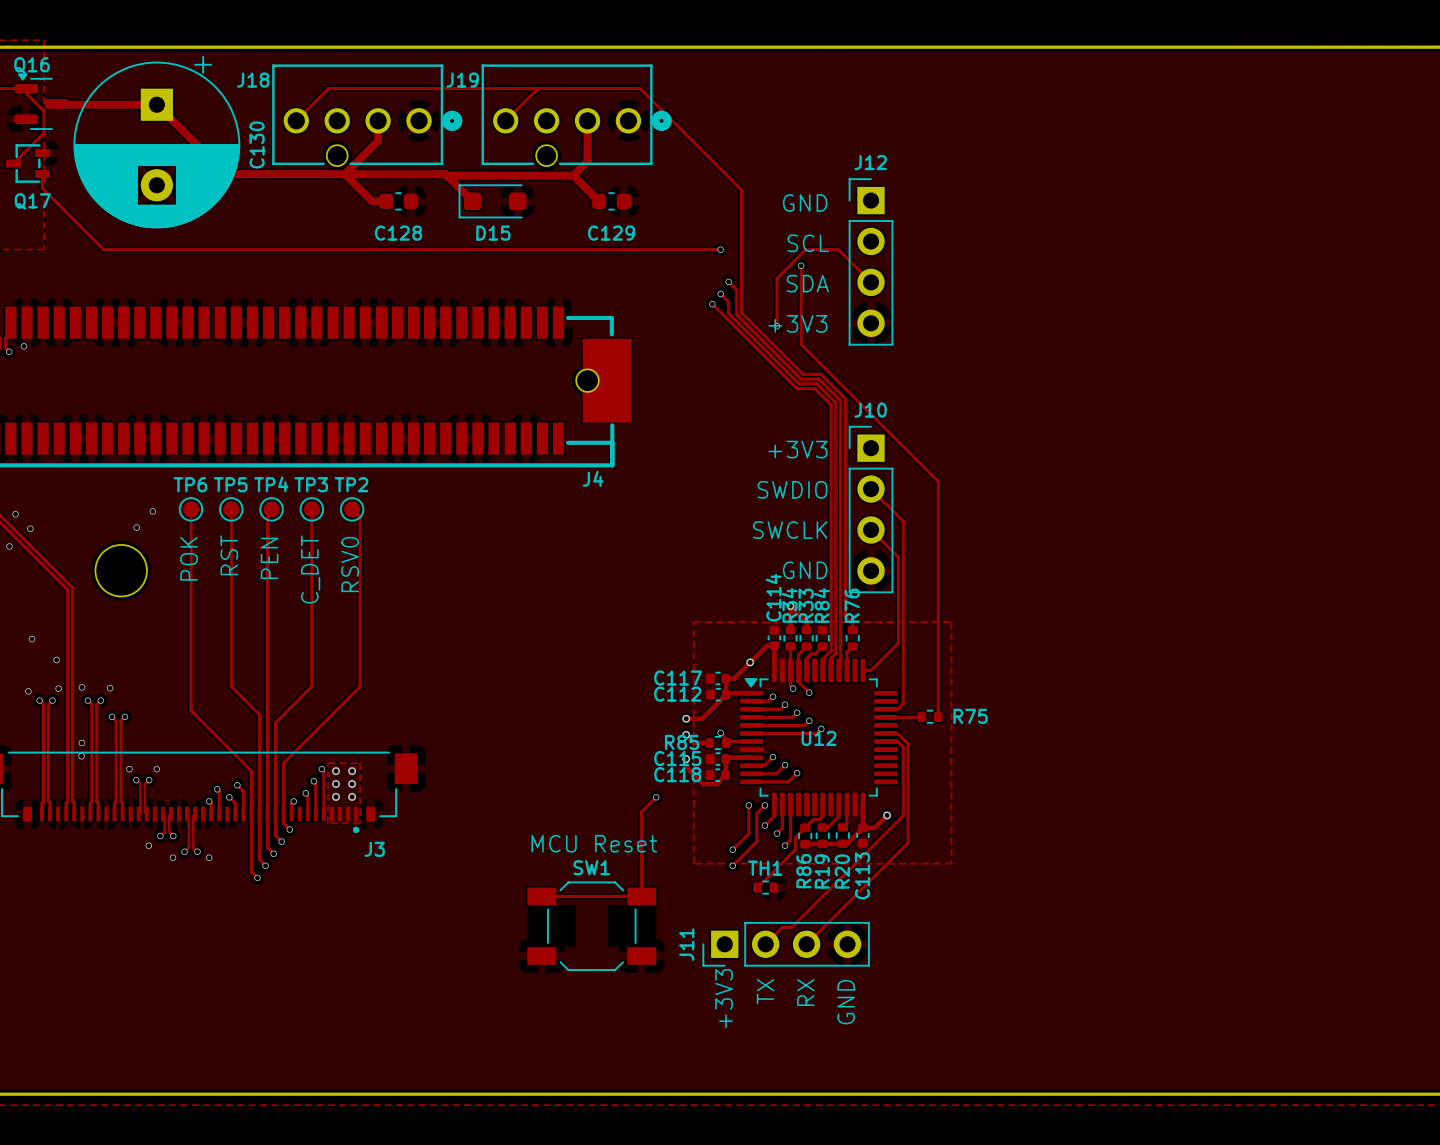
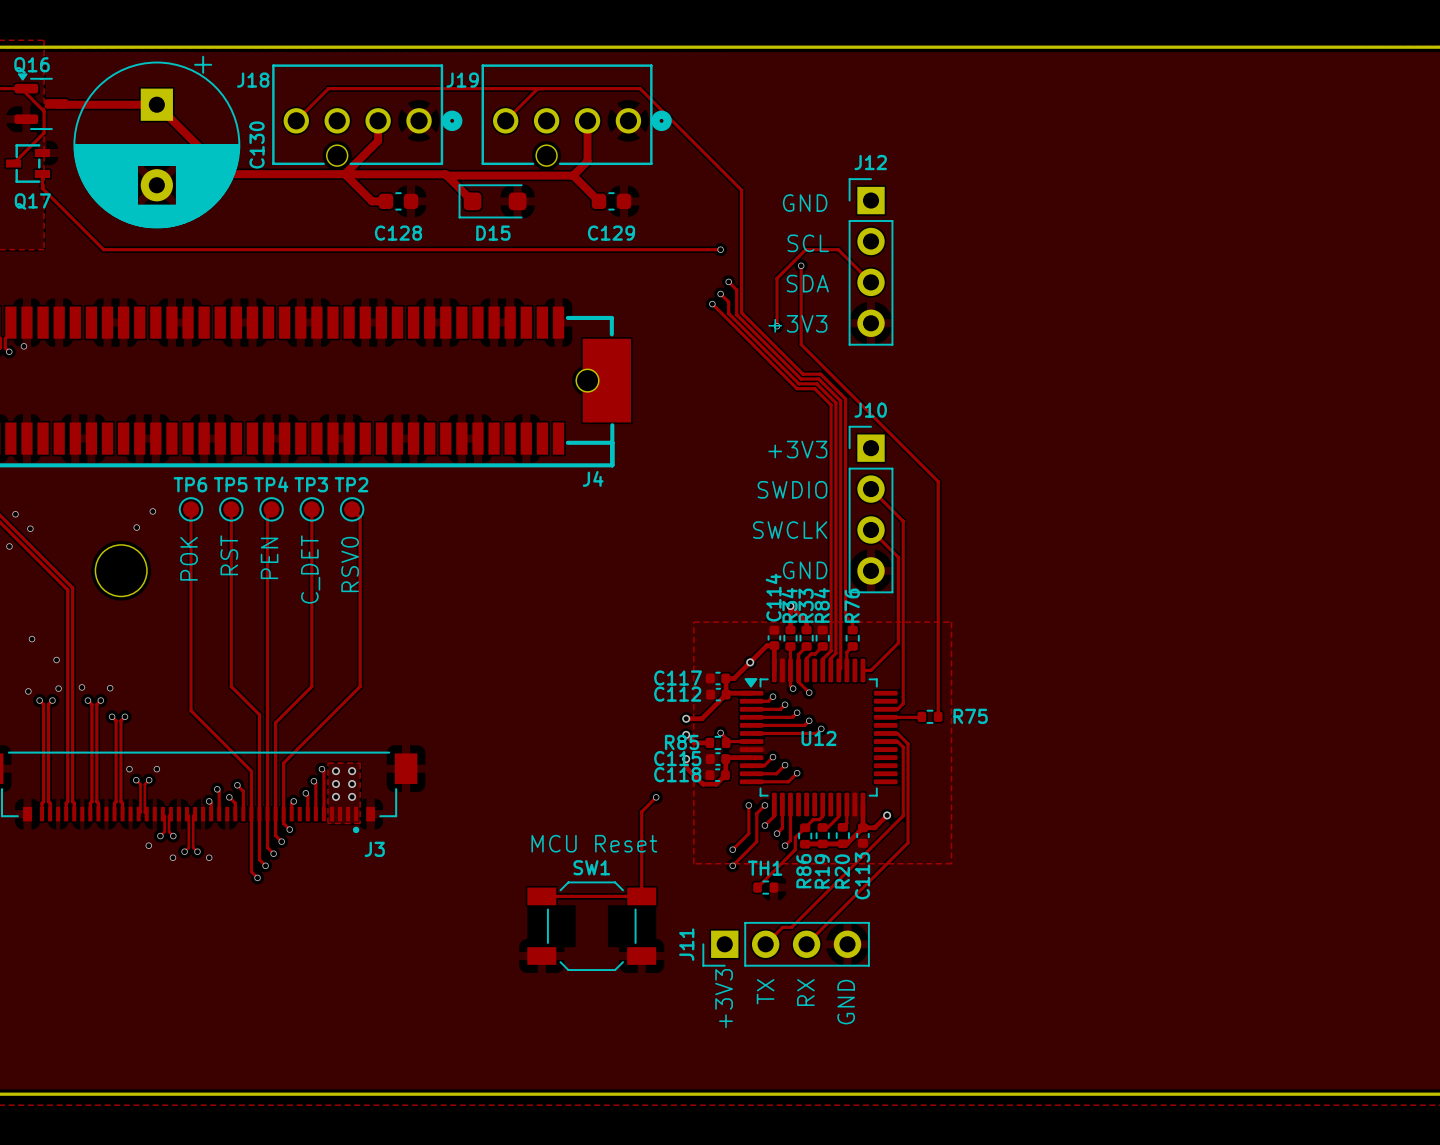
via: (81, 742) -> none
via: (81, 756) -> none

